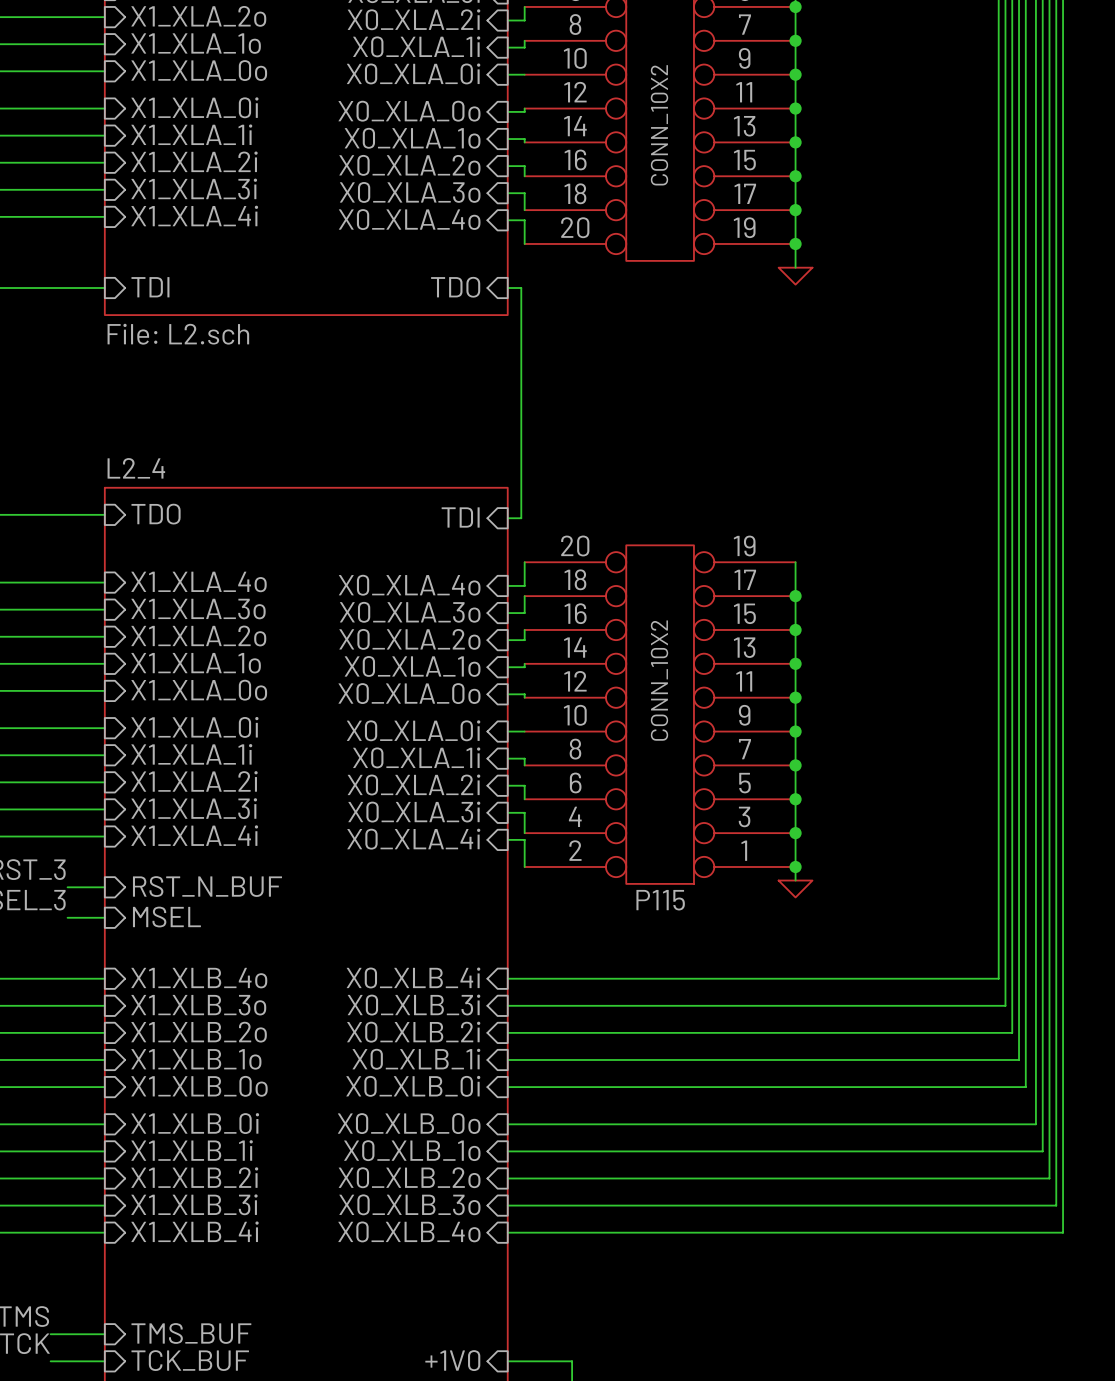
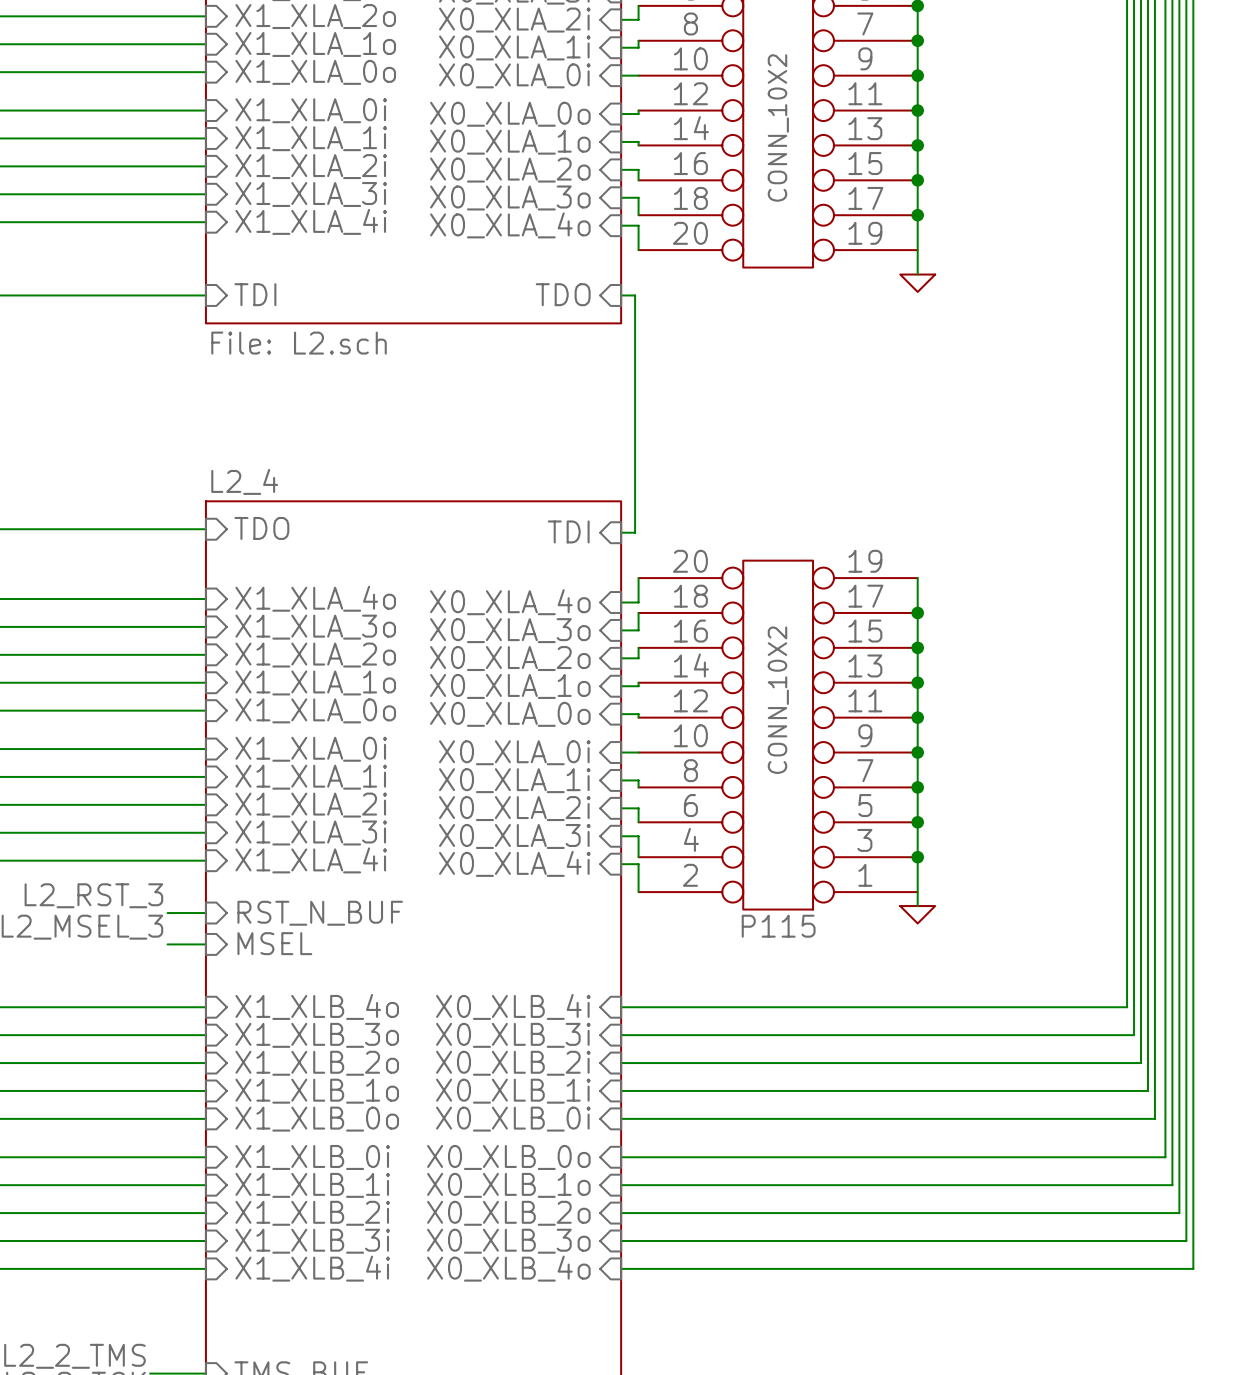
junction: (795, 243) -> none
junction: (795, 866) -> none

